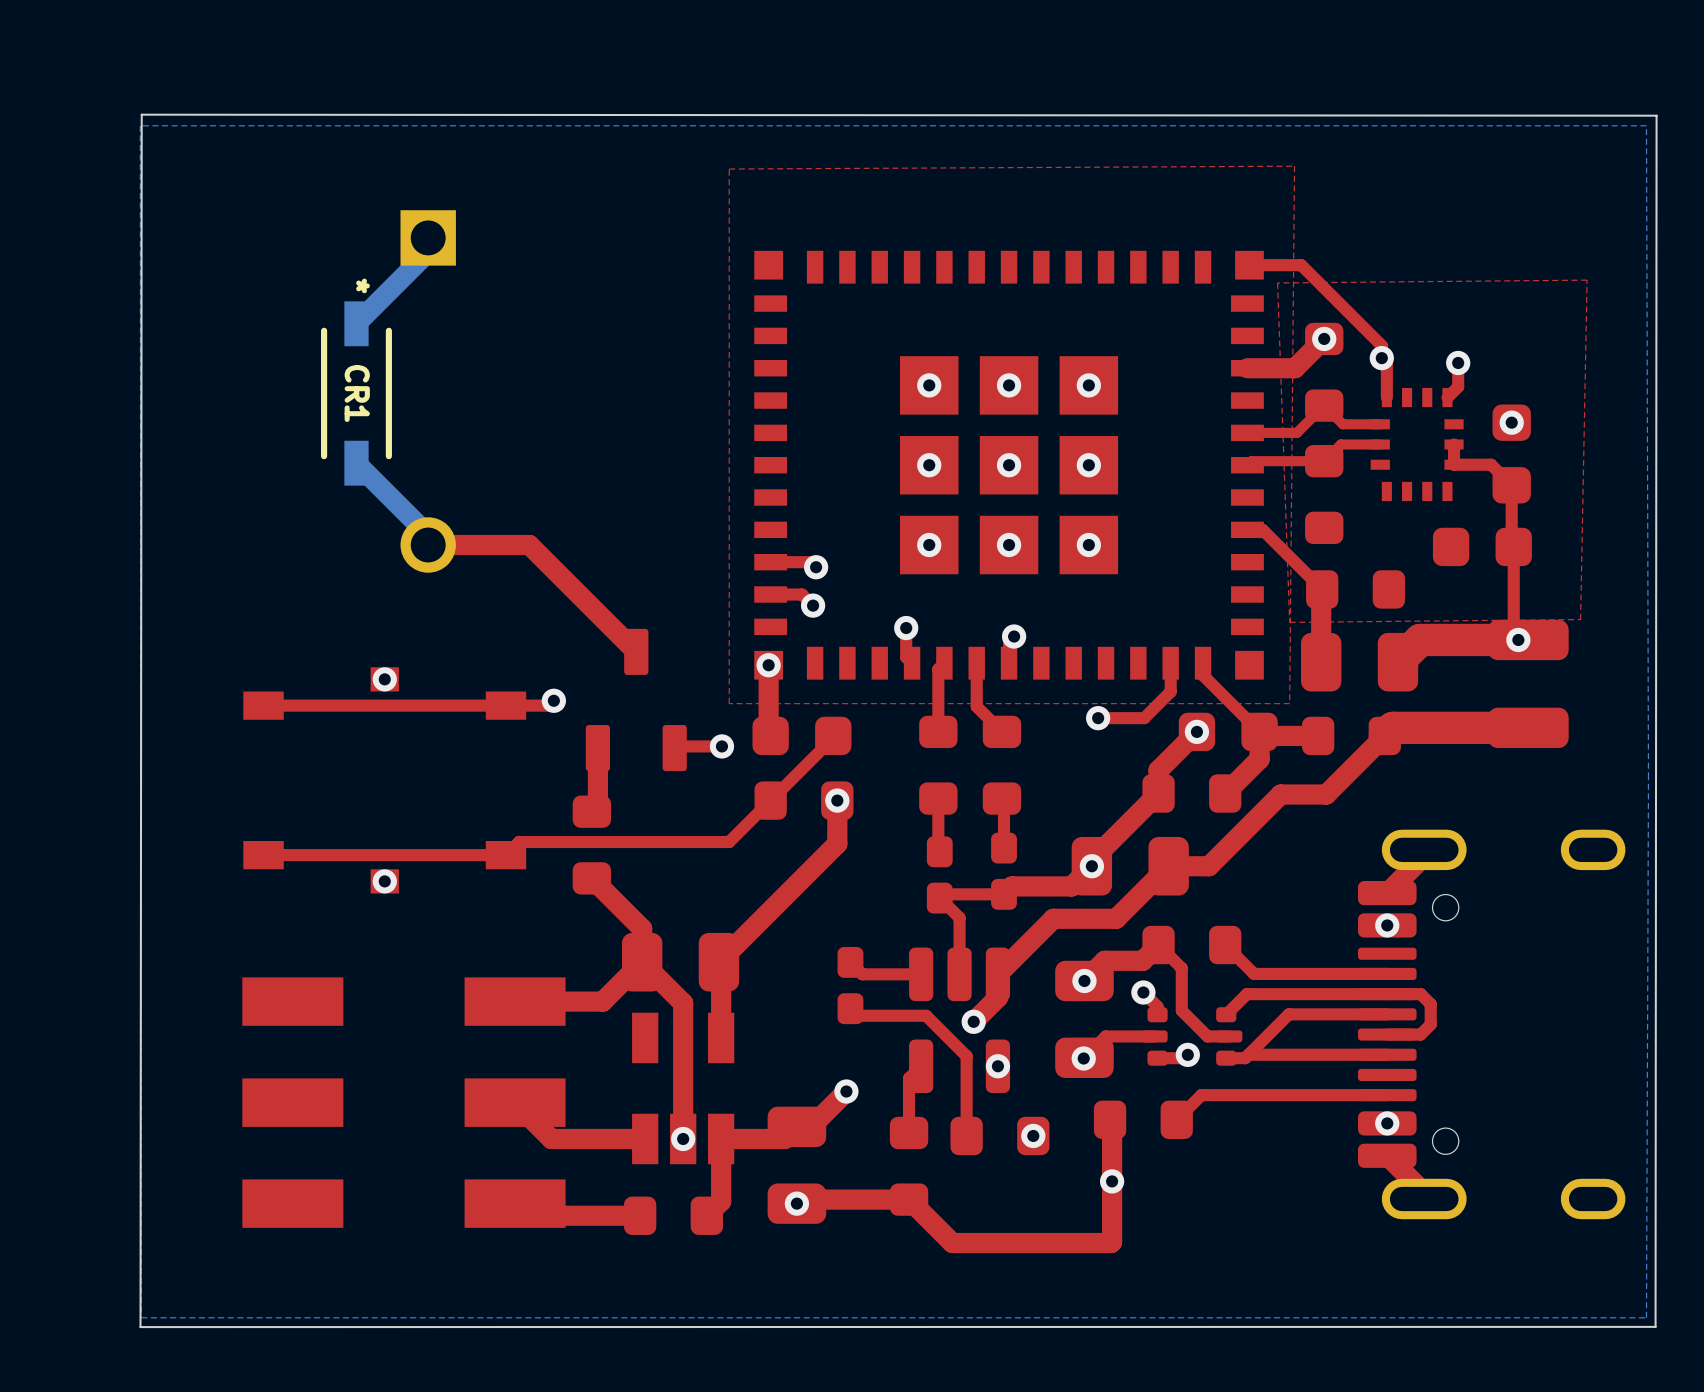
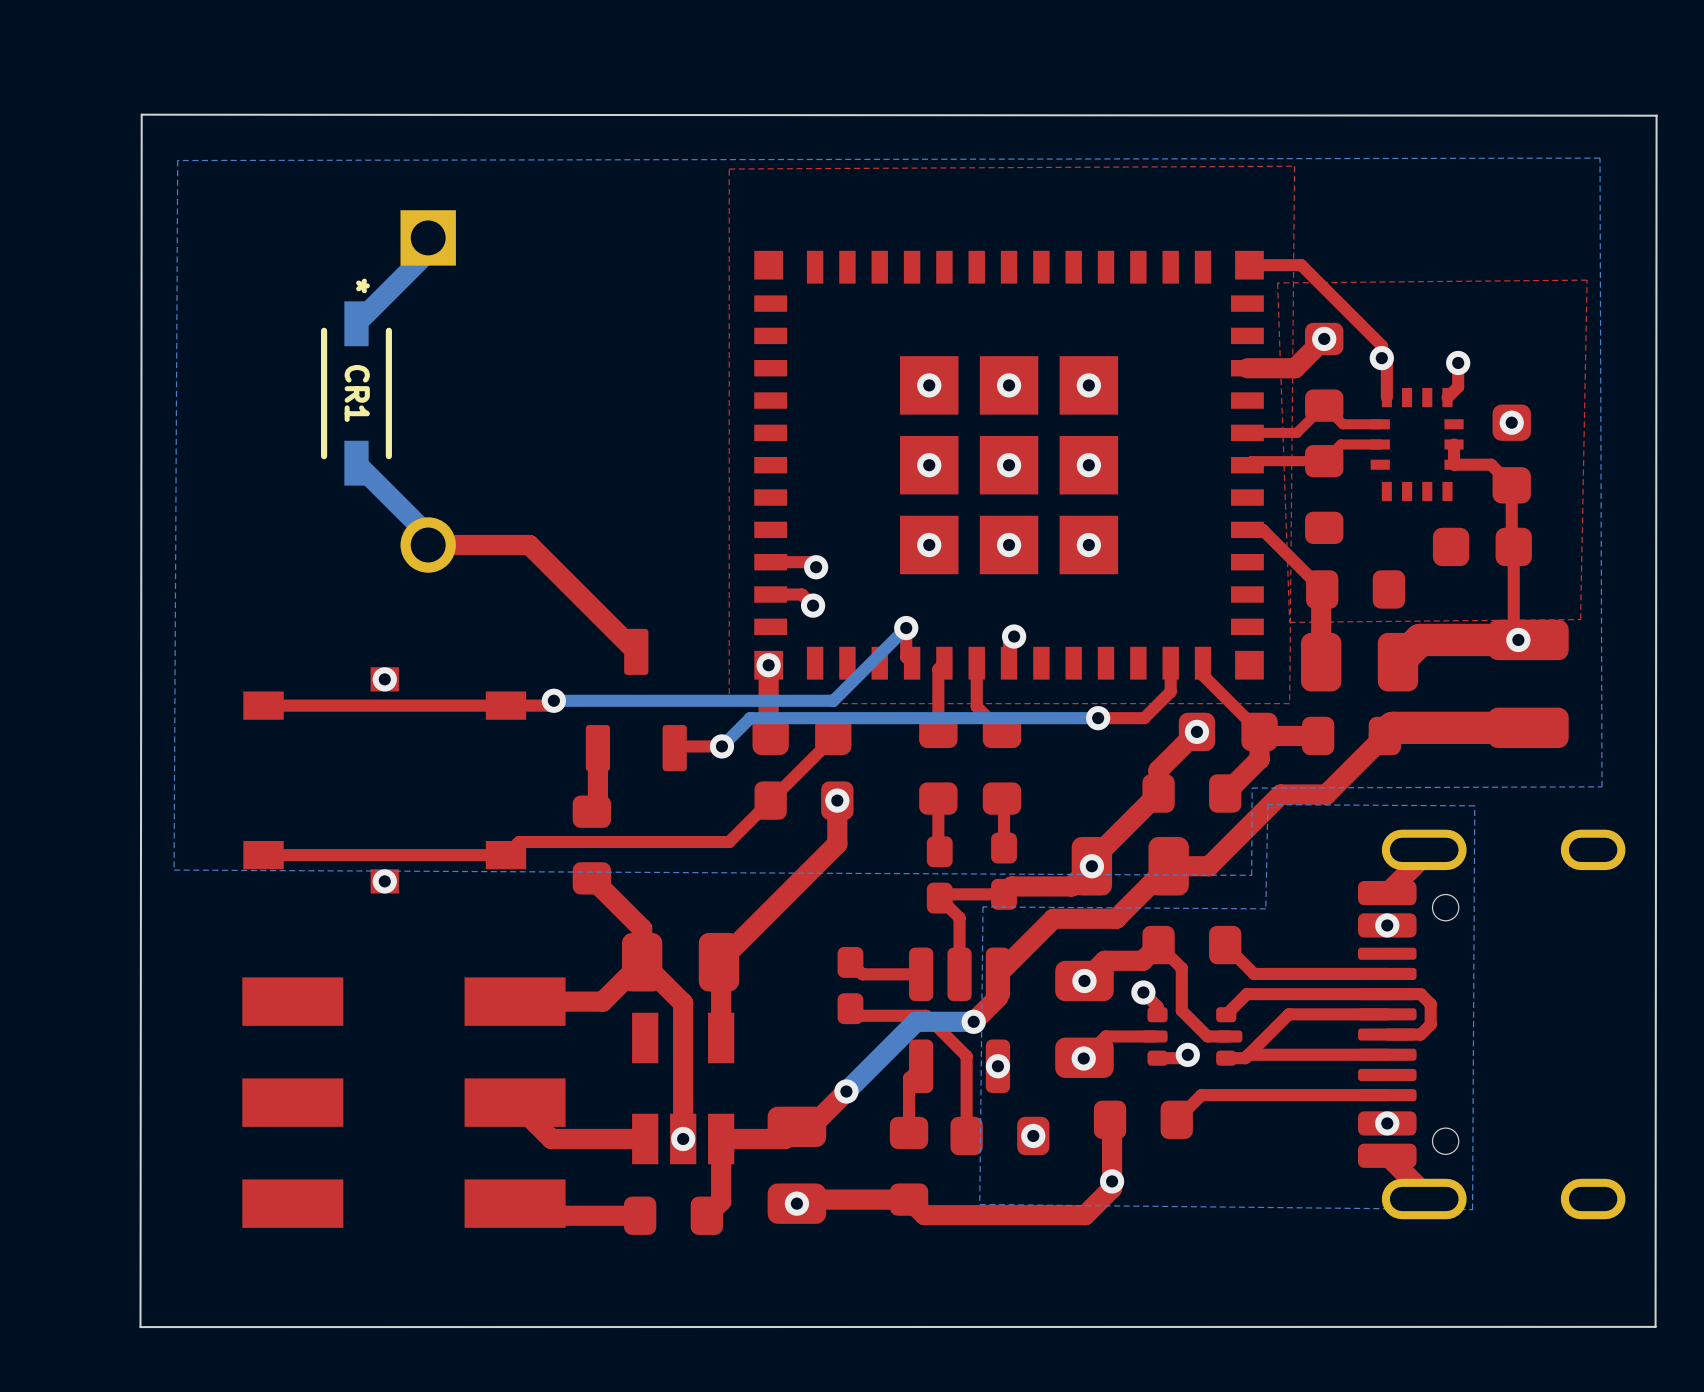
bottom zone outline: (1646, 125) (1648, 778) (1646, 1317) (141, 1317) (140, 125) (1646, 125) -> (1600, 158) (1602, 786) (1252, 788) (1251, 875) (174, 870) (177, 160) (1600, 158)
bottom track: none -> (906, 628) (833, 700) (553, 700)
bottom track: none -> (1098, 718) (750, 718) (721, 746)
bottom zone outline: none -> (1267, 804) (1474, 805) (1472, 1209) (979, 1204) (982, 906) (1265, 908) (1267, 804)
bottom track: none -> (973, 1021) (916, 1021) (846, 1091)
top track: (1112, 1188) (1111, 1243) (952, 1243) (924, 1215) -> (1112, 1188) (1085, 1215) (924, 1215)

